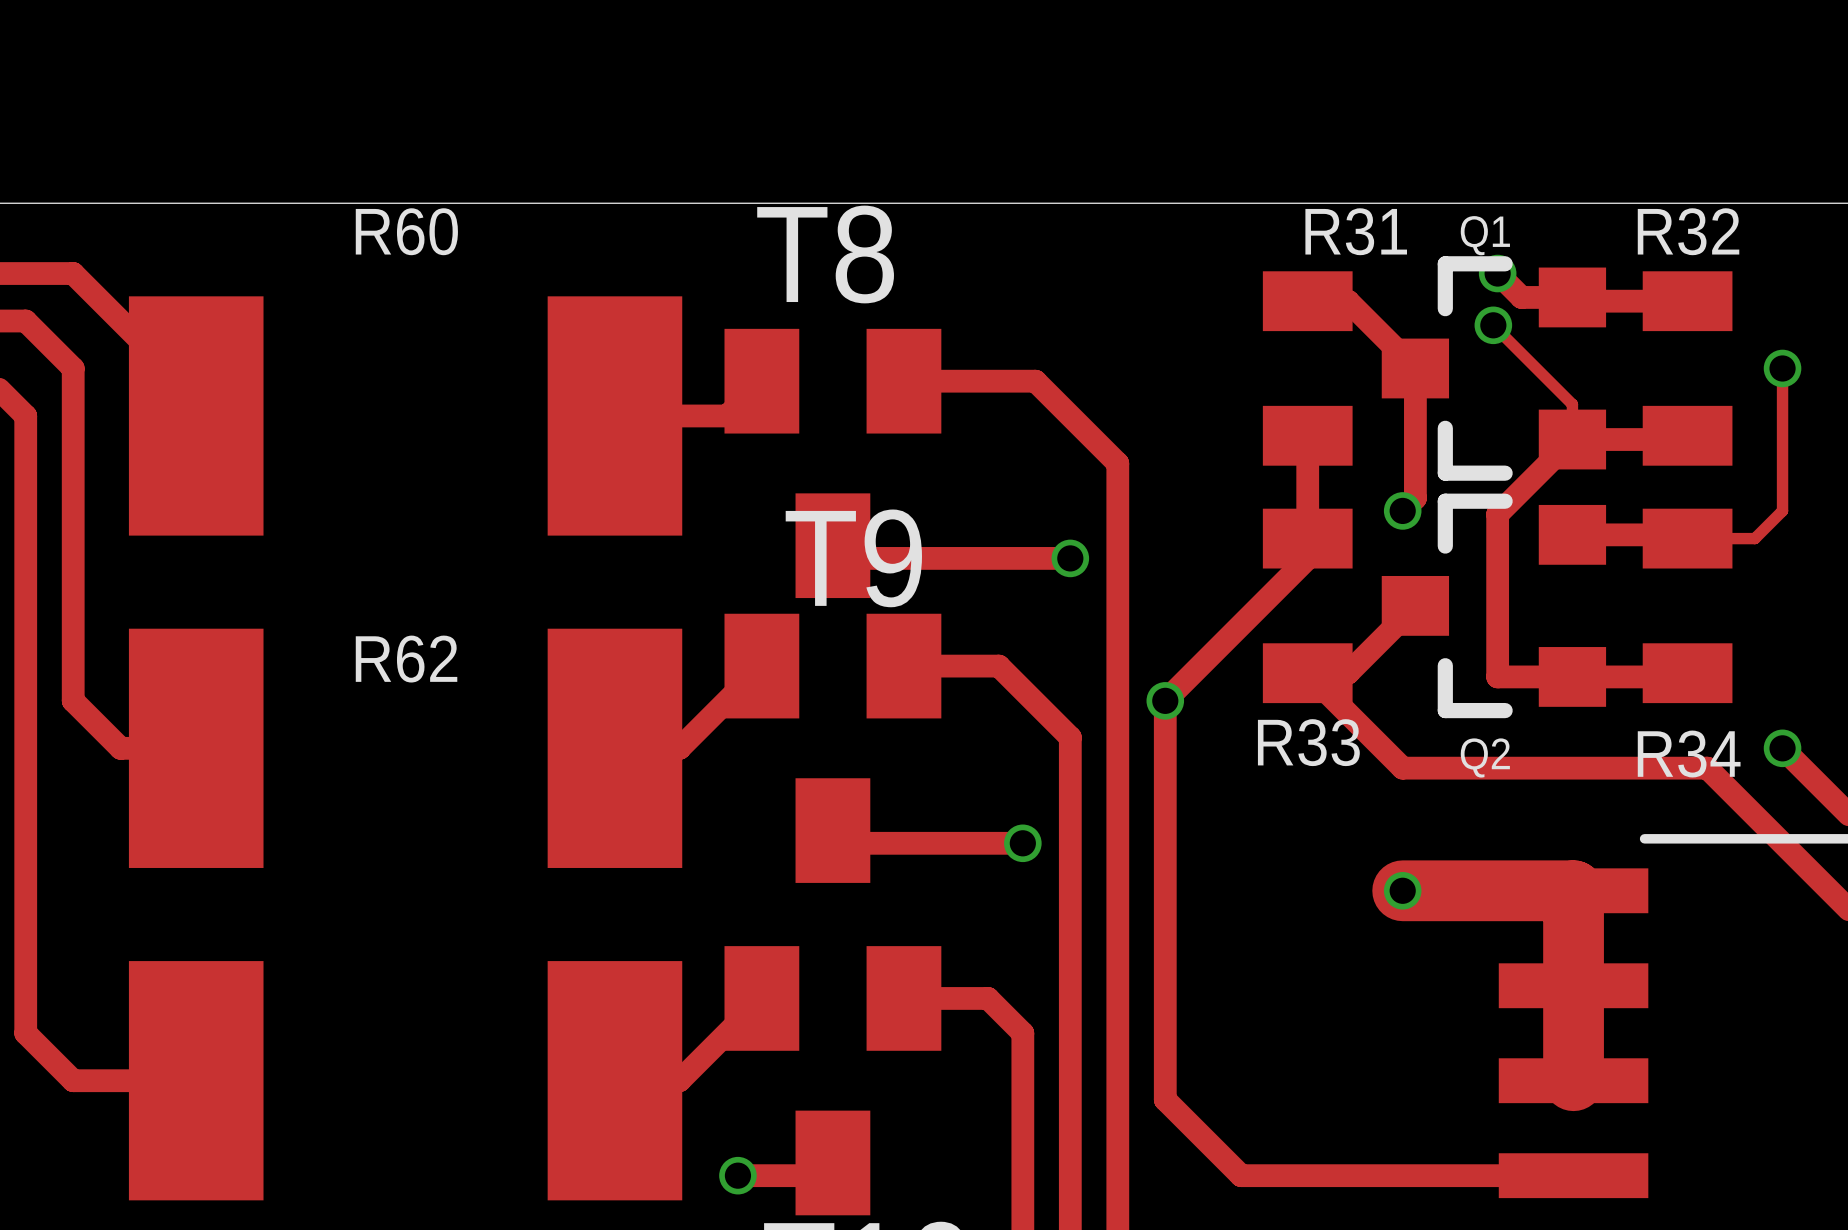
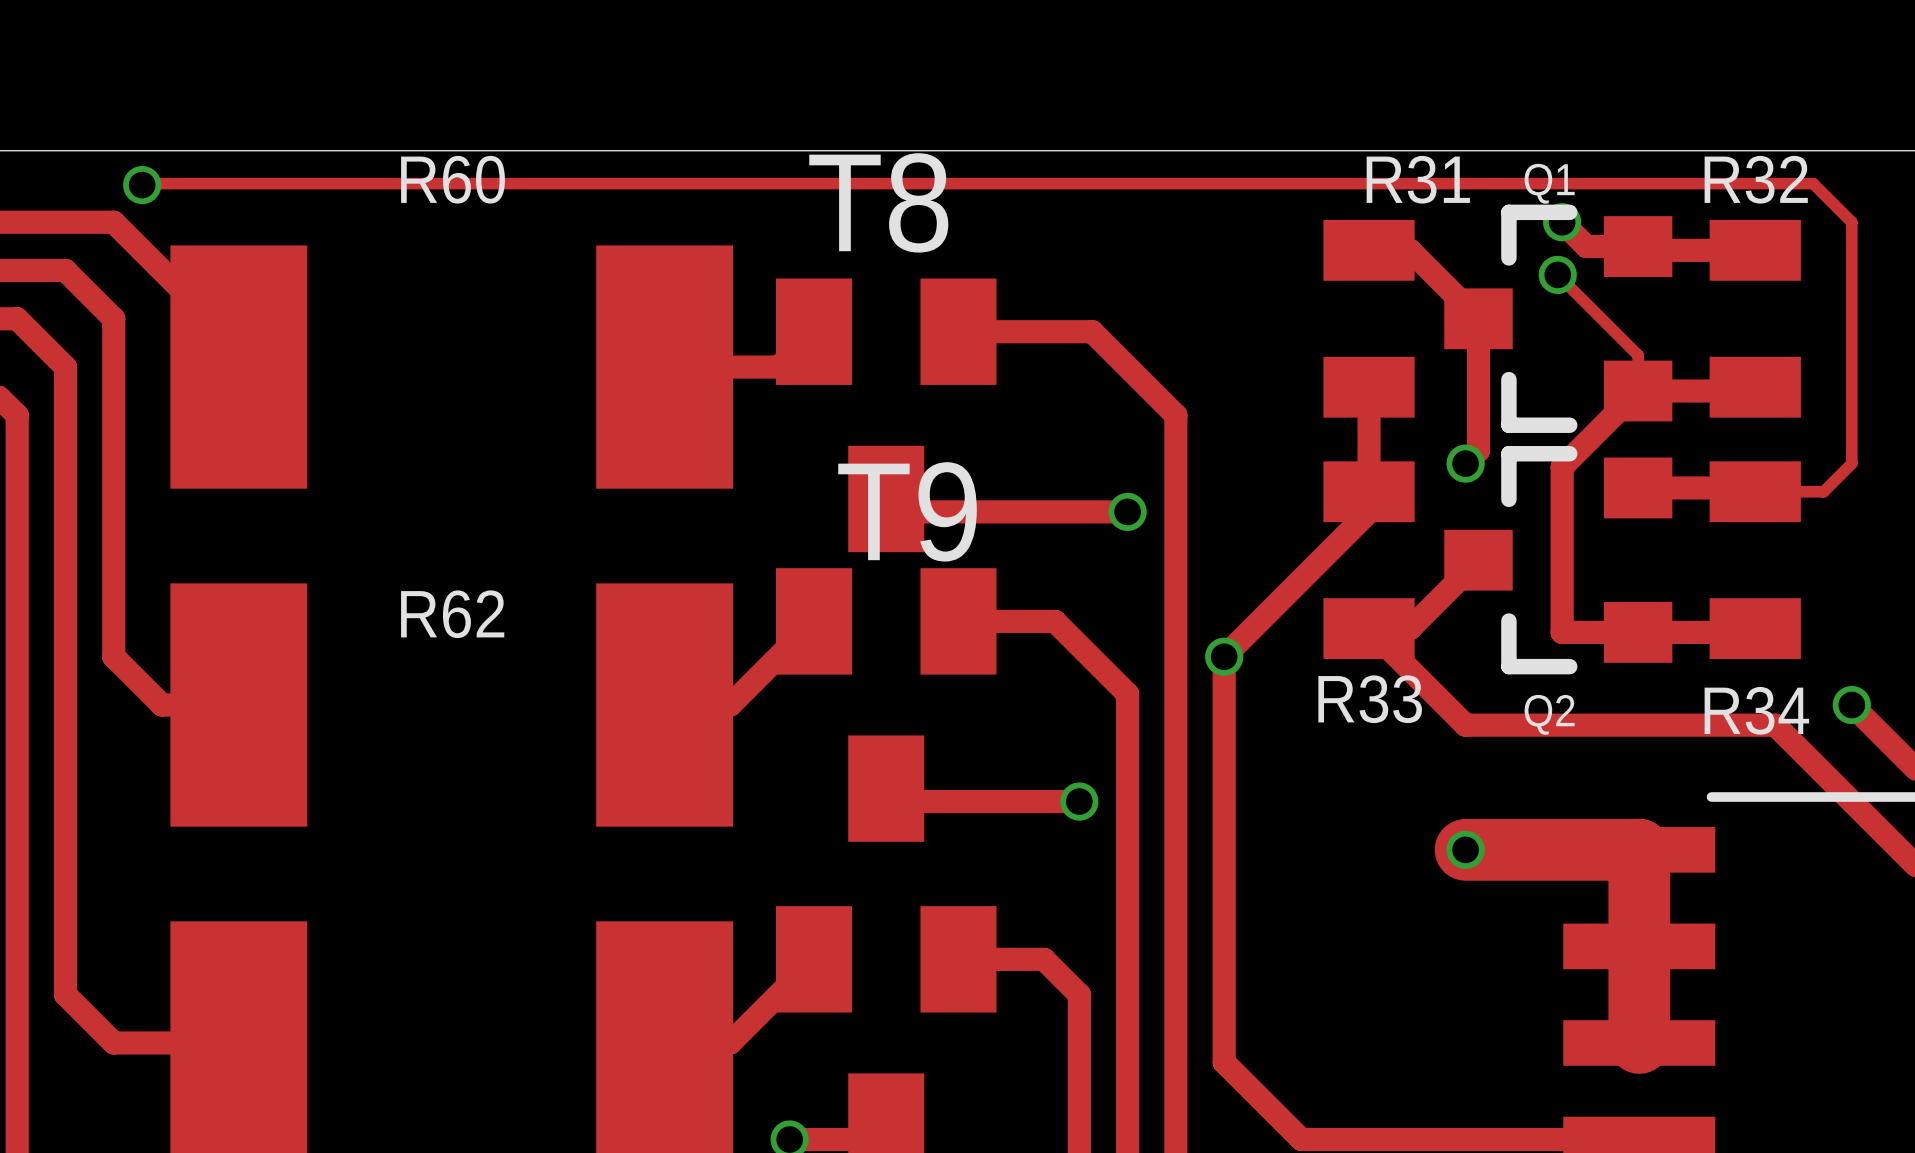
track: none -> (142, 185) (1813, 183) (1851, 222) (1851, 318)
via: none -> (142, 185)
via: (1782, 368) -> none

